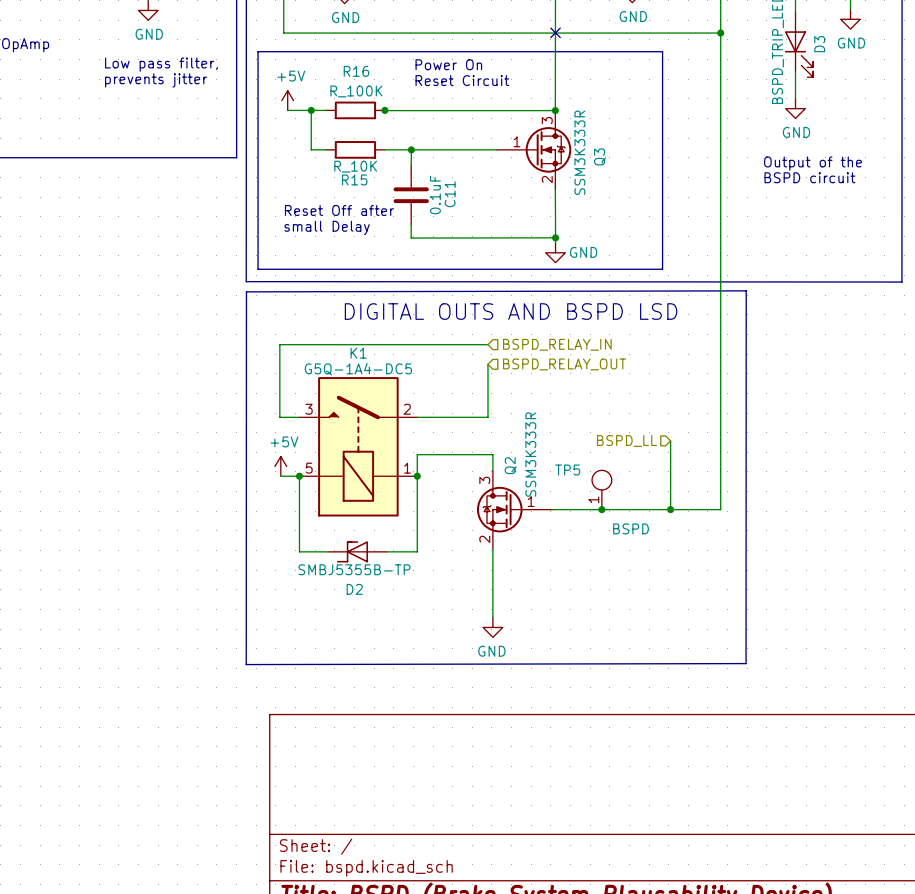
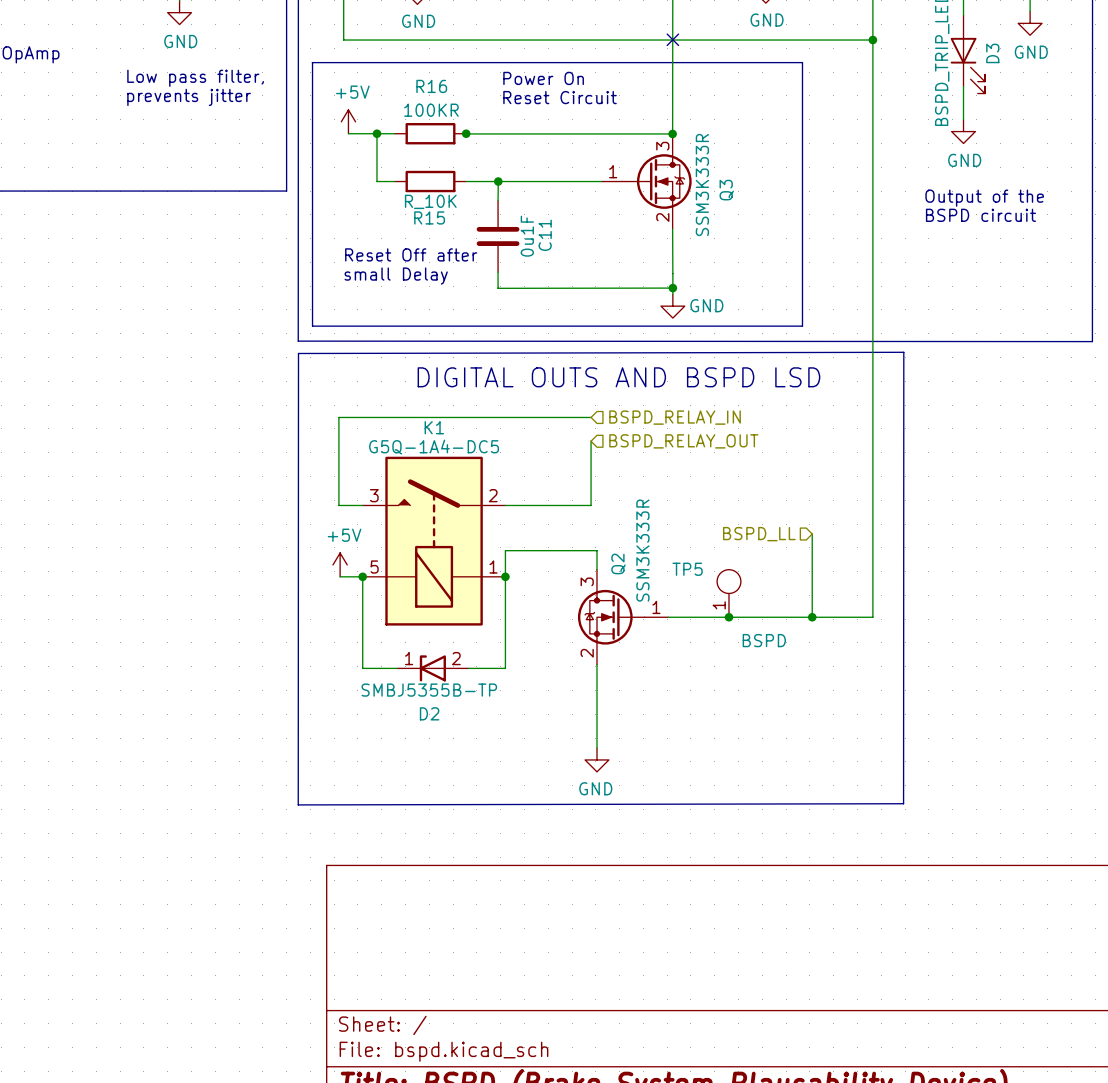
R16 value: R_100K (356, 91) -> 100KR (431, 110)
Q3 symbol: [496, 110, 572, 190] -> [601, 133, 692, 230]
C11 value: 0.1uF (435, 195) -> 0u1F (527, 236)
Q2 symbol: [476, 470, 552, 549] -> [577, 569, 669, 665]
D2 symbol: [327, 541, 387, 563] -> [397, 655, 469, 682]

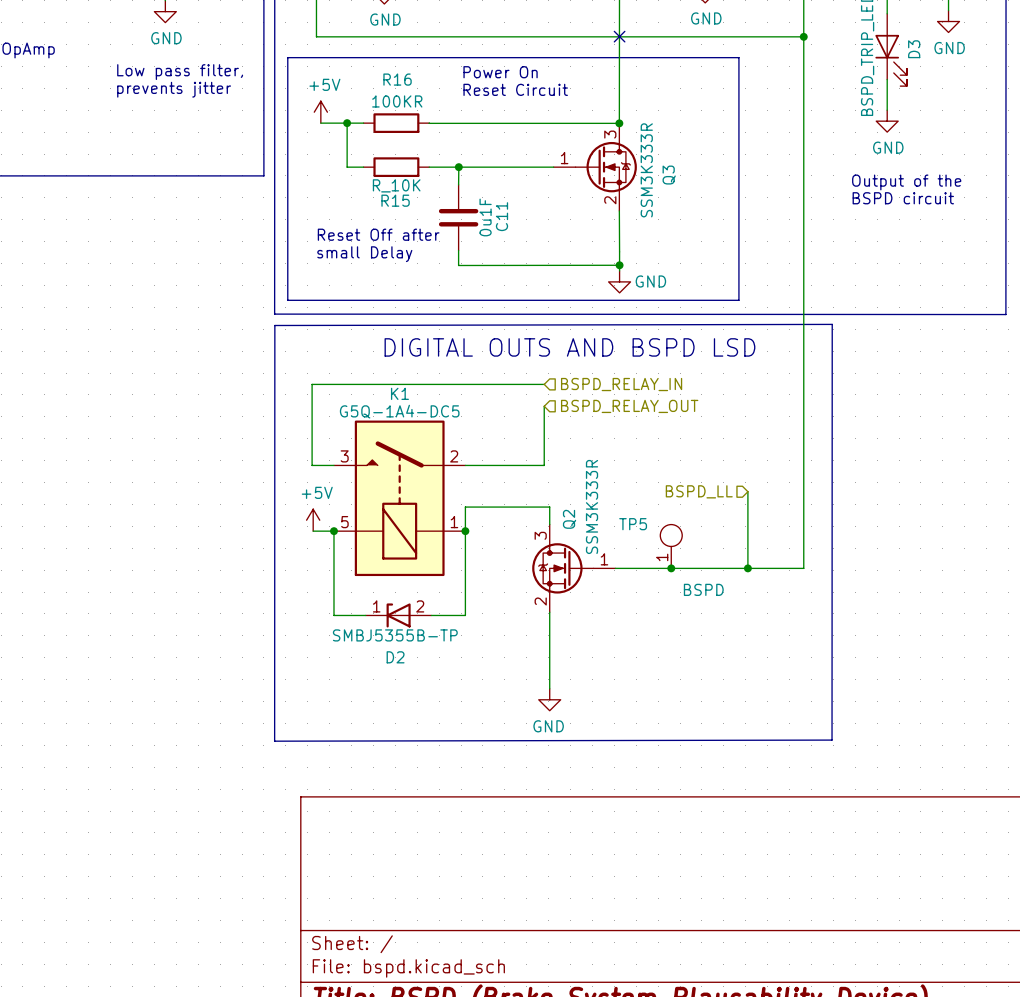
junction: (466, 133) -> none

